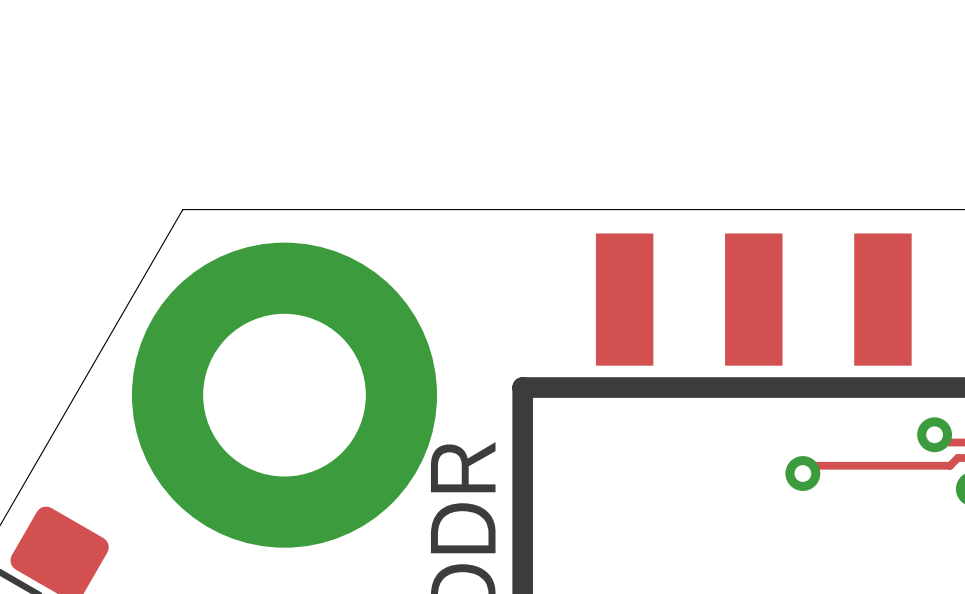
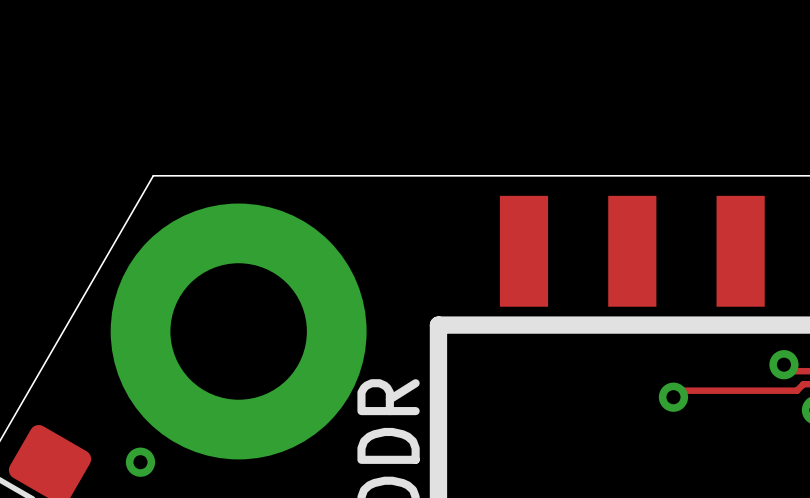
via: none -> (140, 462)

